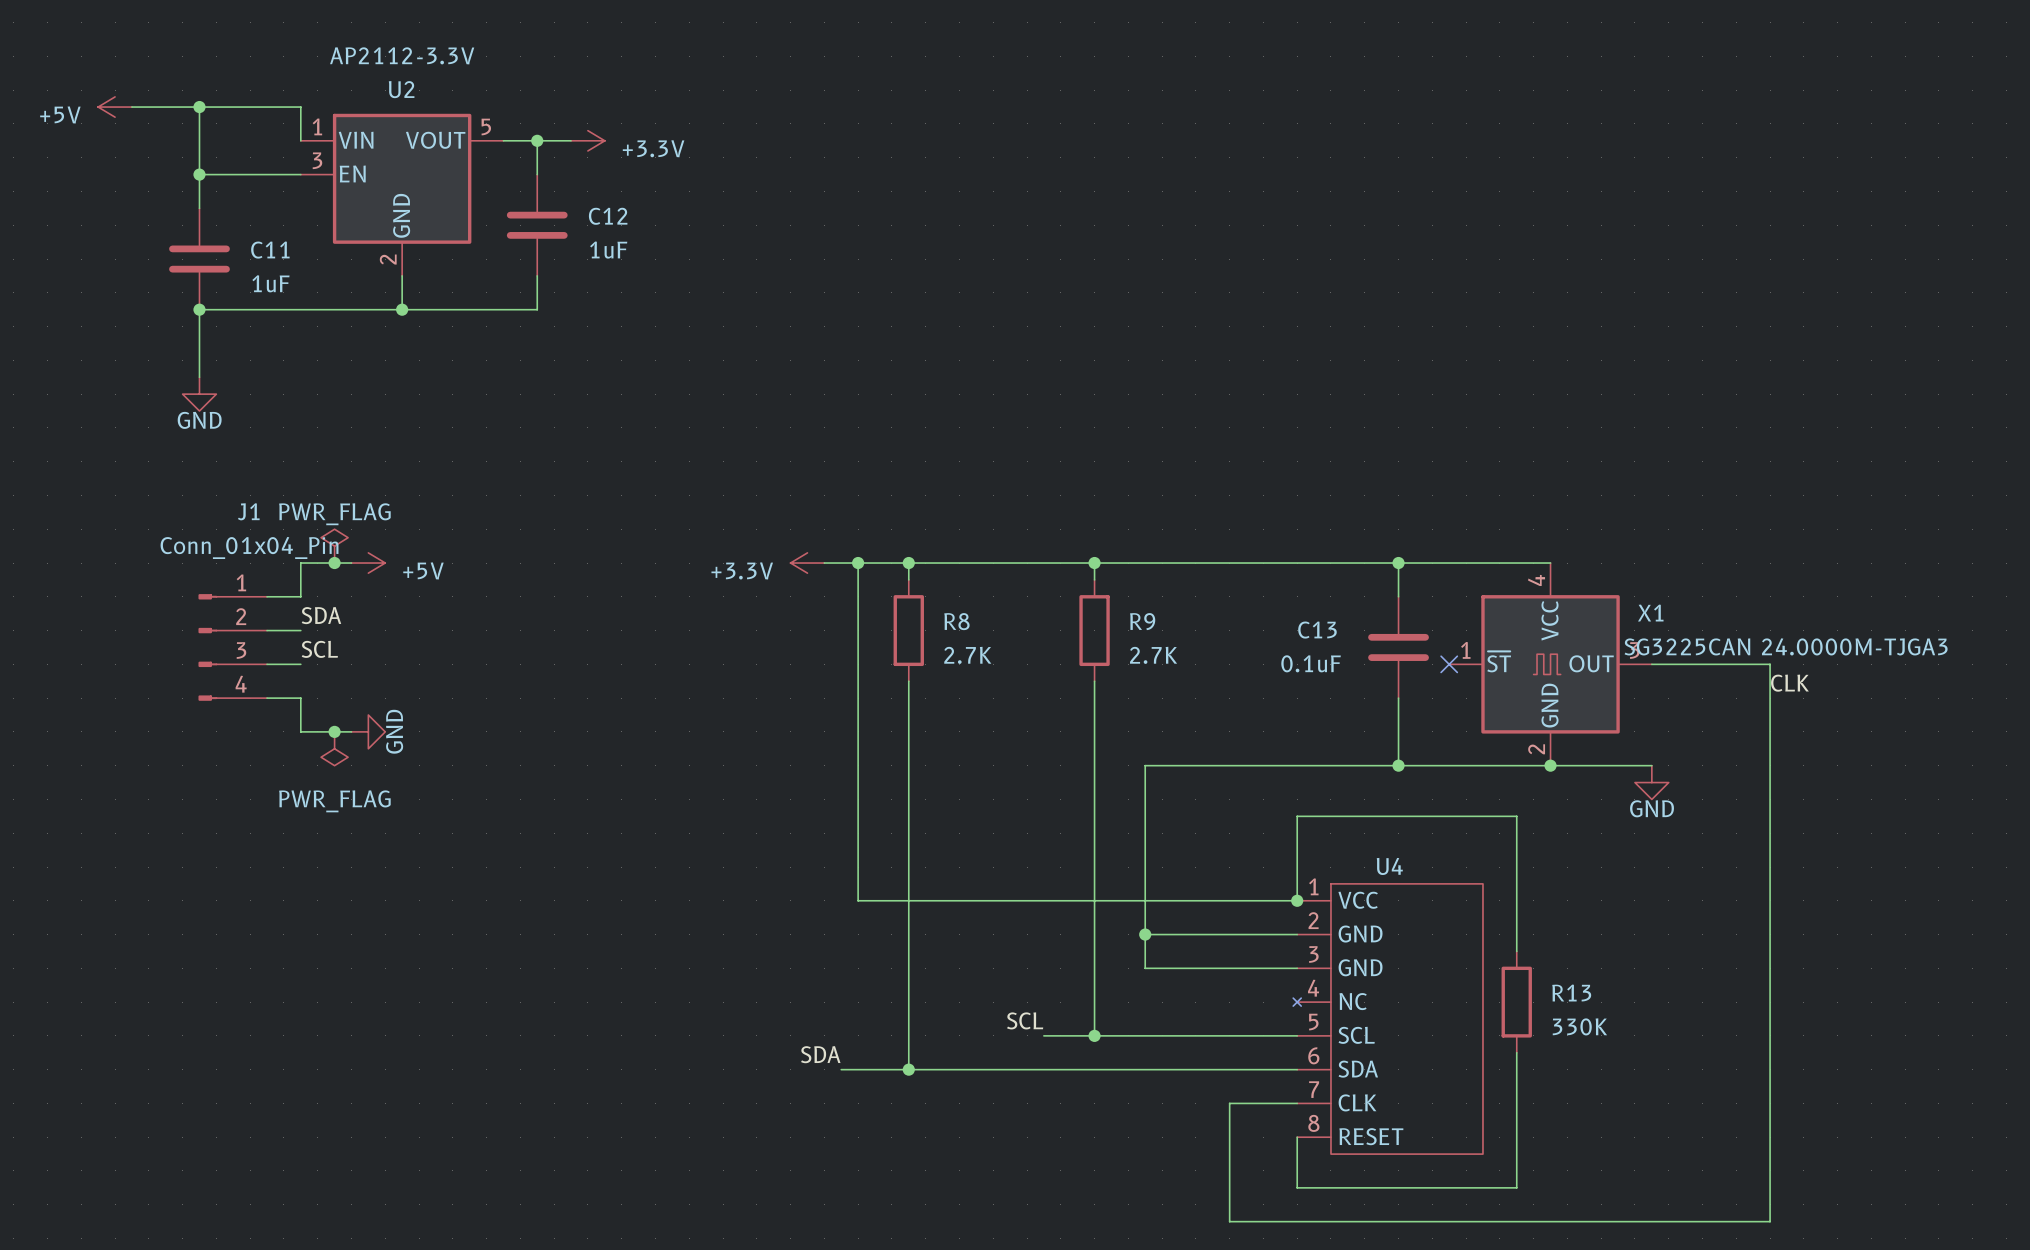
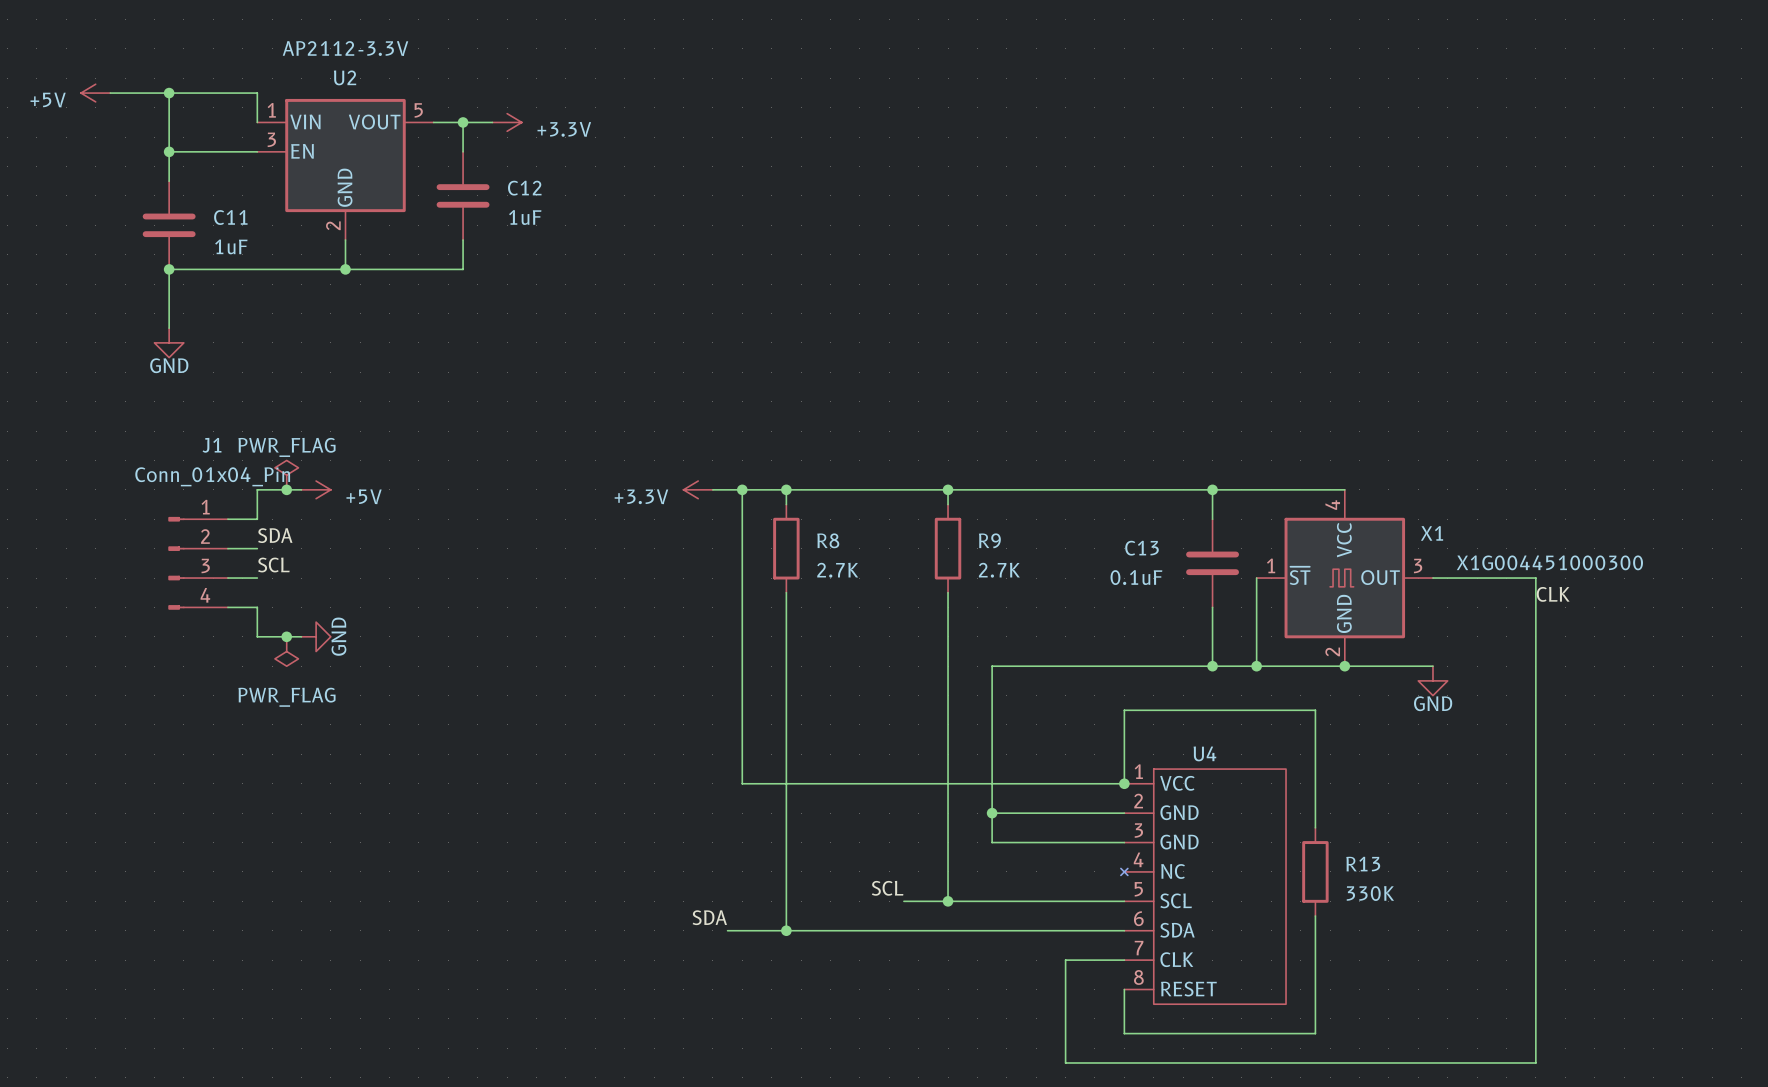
X1 value: SG3225CAN 24.0000M-TJGA3 (1786, 646) -> X1G004451000300 (1549, 562)
wire: none -> (1256, 578) (1256, 666)
no-connect mark: (1449, 664) -> none
junction: none -> (1256, 666)

